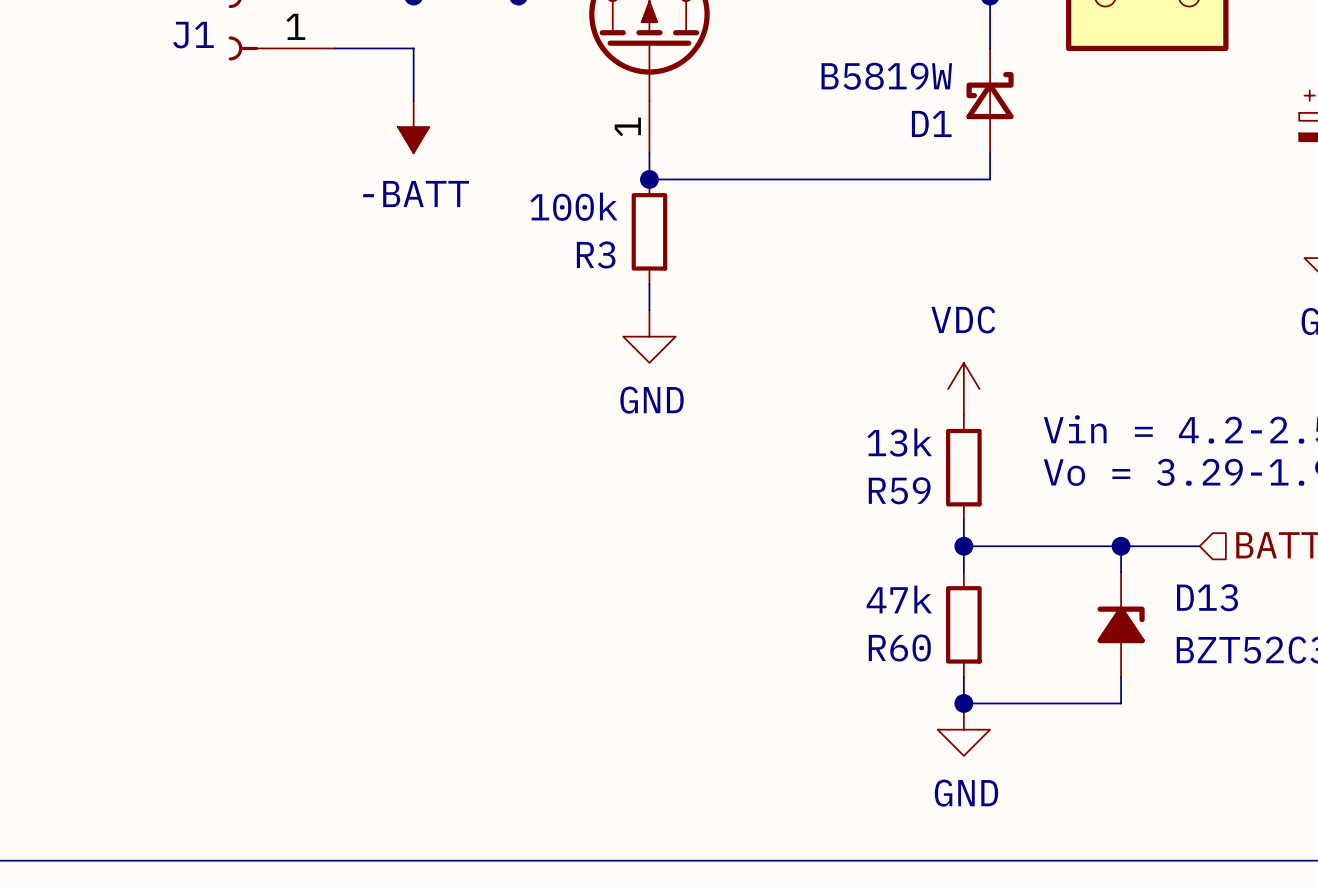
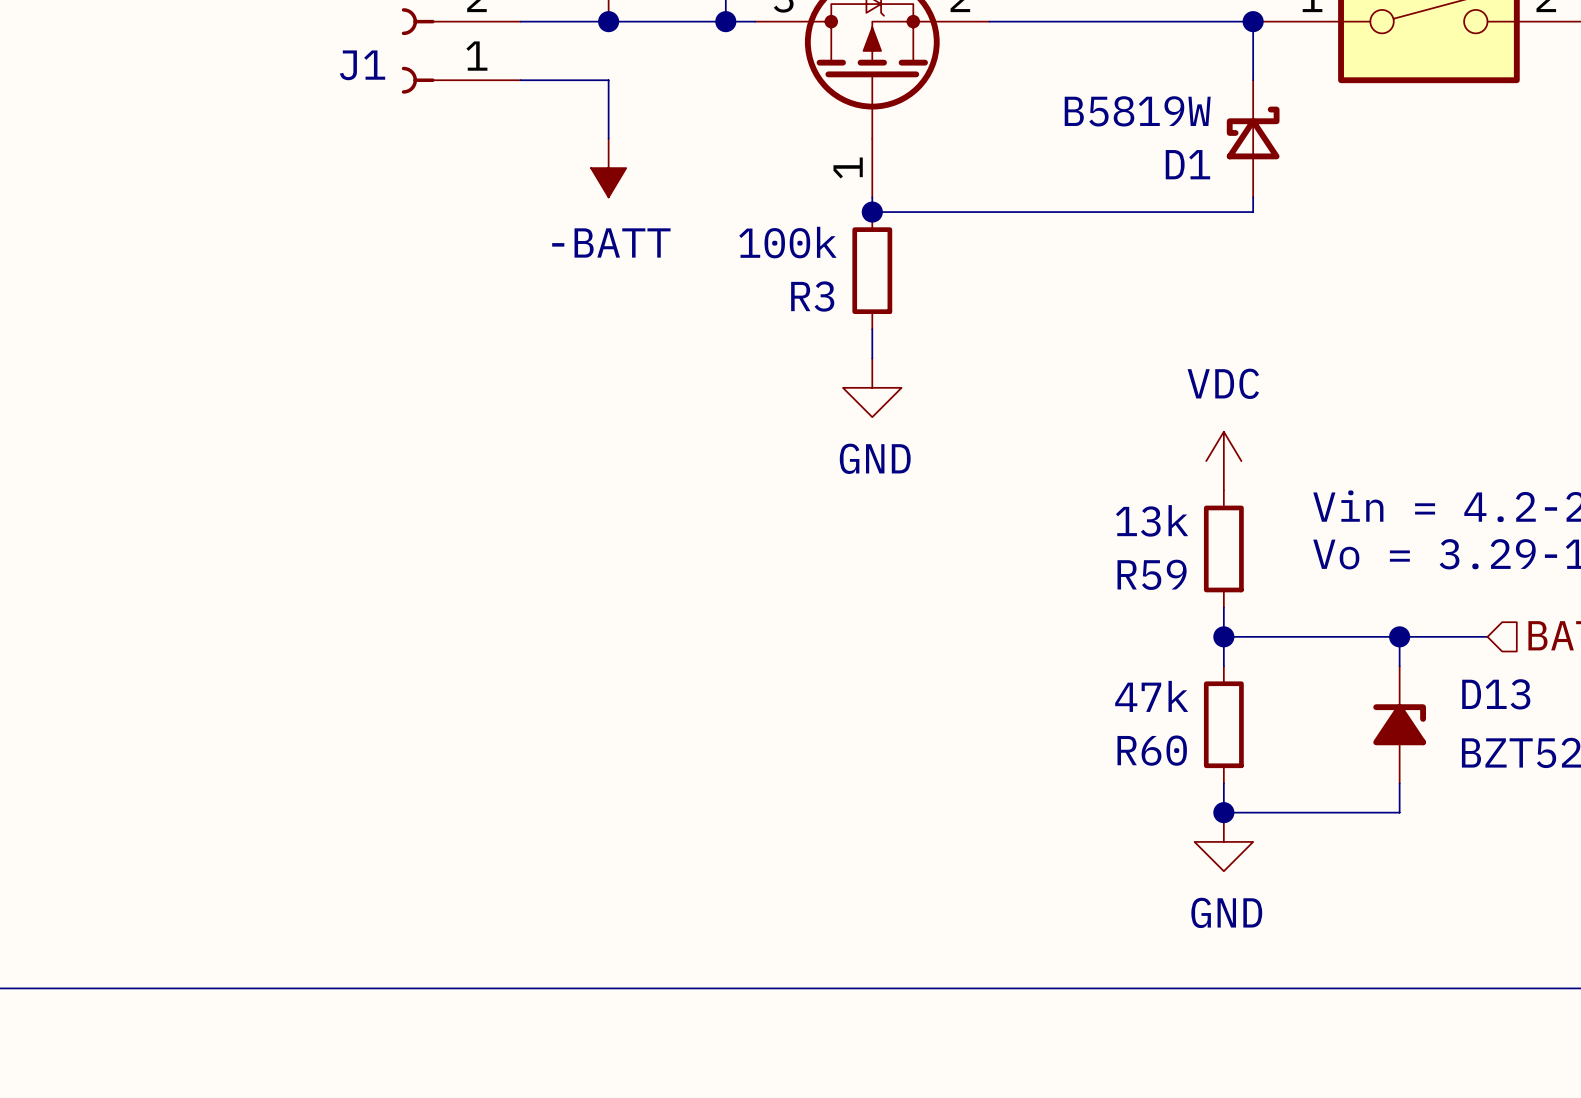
wire: (649, 166) (649, 179) (990, 179) (990, 166) -> (872, 212) (1253, 212)
junction position: (649, 179) -> (872, 212)
R3 position: (649, 231) -> (872, 270)
power symbol position: GND (649, 336) -> GND (872, 387)

